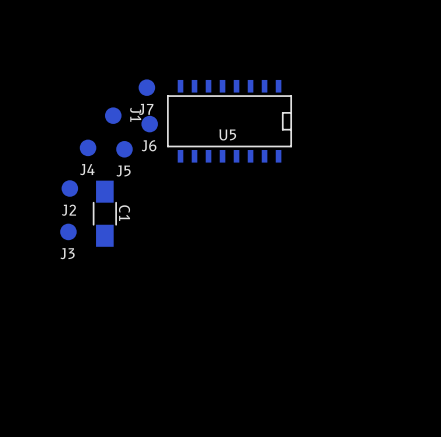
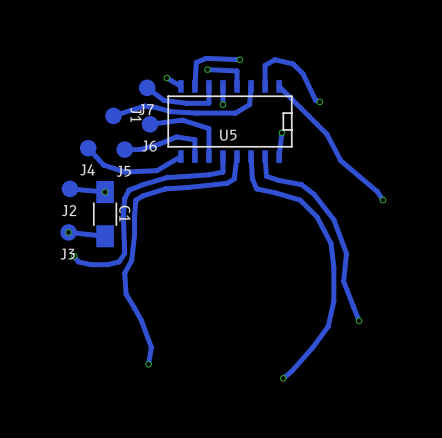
track: none -> (239, 59) (206, 58) (196, 62) (194, 86)
via: none -> (239, 59)
track: none -> (207, 69) (237, 70) (237, 86)
via: none -> (207, 69)
track: none -> (166, 78) (180, 86)
via: none -> (166, 78)
track: none -> (208, 86) (208, 103) (164, 100) (147, 87)
track: none -> (222, 86) (222, 104)
track: none -> (251, 86) (249, 104) (235, 113) (171, 111) (144, 106) (113, 115)
track: none -> (265, 86) (265, 65) (274, 59) (293, 63) (302, 73) (315, 100) (319, 101)
track: none -> (279, 86) (326, 134) (340, 160) (377, 191) (382, 200)
via: none -> (319, 101)
via: none -> (222, 104)
track: none -> (149, 124) (182, 120) (208, 128) (208, 156)
track: none -> (281, 132) (279, 156)
via: none -> (281, 132)
track: none -> (88, 148) (103, 165) (124, 172) (157, 170) (180, 156)
track: none -> (124, 149) (140, 149) (176, 136) (194, 139) (194, 156)
track: none -> (222, 156) (222, 172) (166, 177) (128, 190) (124, 198) (123, 215) (124, 253) (119, 261) (107, 264) (91, 264) (78, 261) (74, 256)
track: none -> (237, 156) (234, 179) (227, 183) (165, 188) (135, 200) (131, 260) (124, 273) (126, 294) (141, 320) (151, 347) (148, 364)
track: none -> (251, 156) (252, 179) (256, 188) (300, 200) (317, 216) (331, 243) (333, 267) (333, 301) (328, 326) (312, 347) (283, 378)
track: none -> (265, 156) (266, 176) (301, 184) (314, 194) (333, 219) (346, 253) (343, 281) (359, 320)
track: none -> (69, 188) (105, 192)
via: none -> (105, 192)
via: none -> (382, 200)
track: none -> (68, 232) (105, 236)
via: none -> (68, 232)
via: none -> (74, 256)
via: none -> (359, 320)
via: none -> (148, 364)
via: none -> (283, 378)

